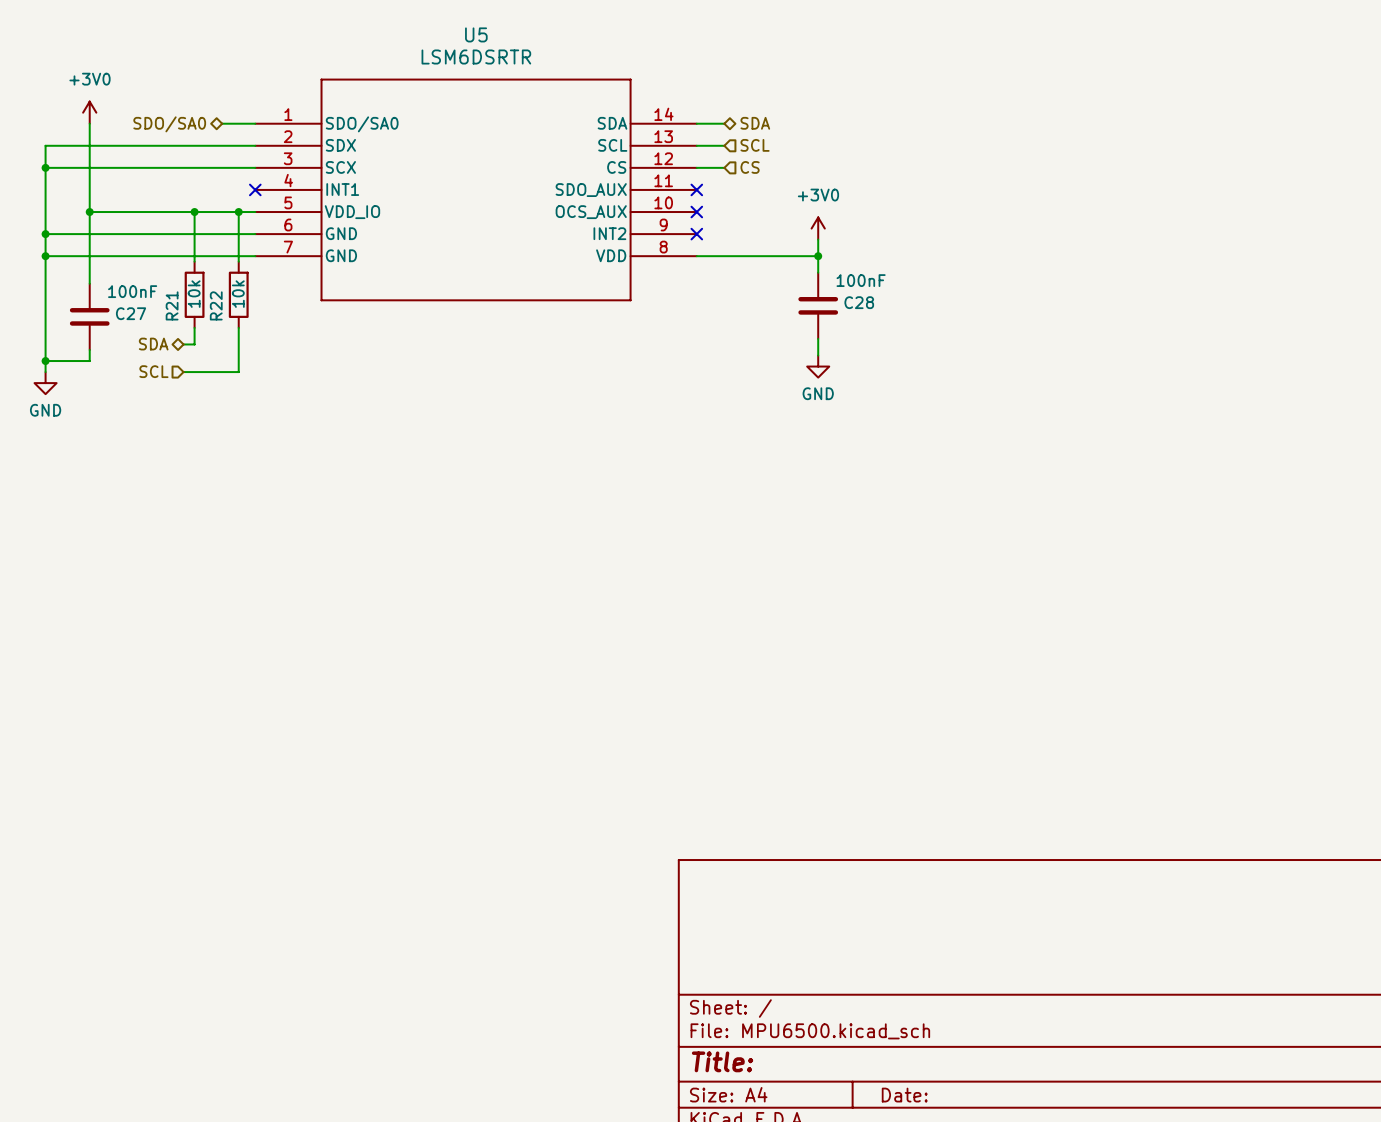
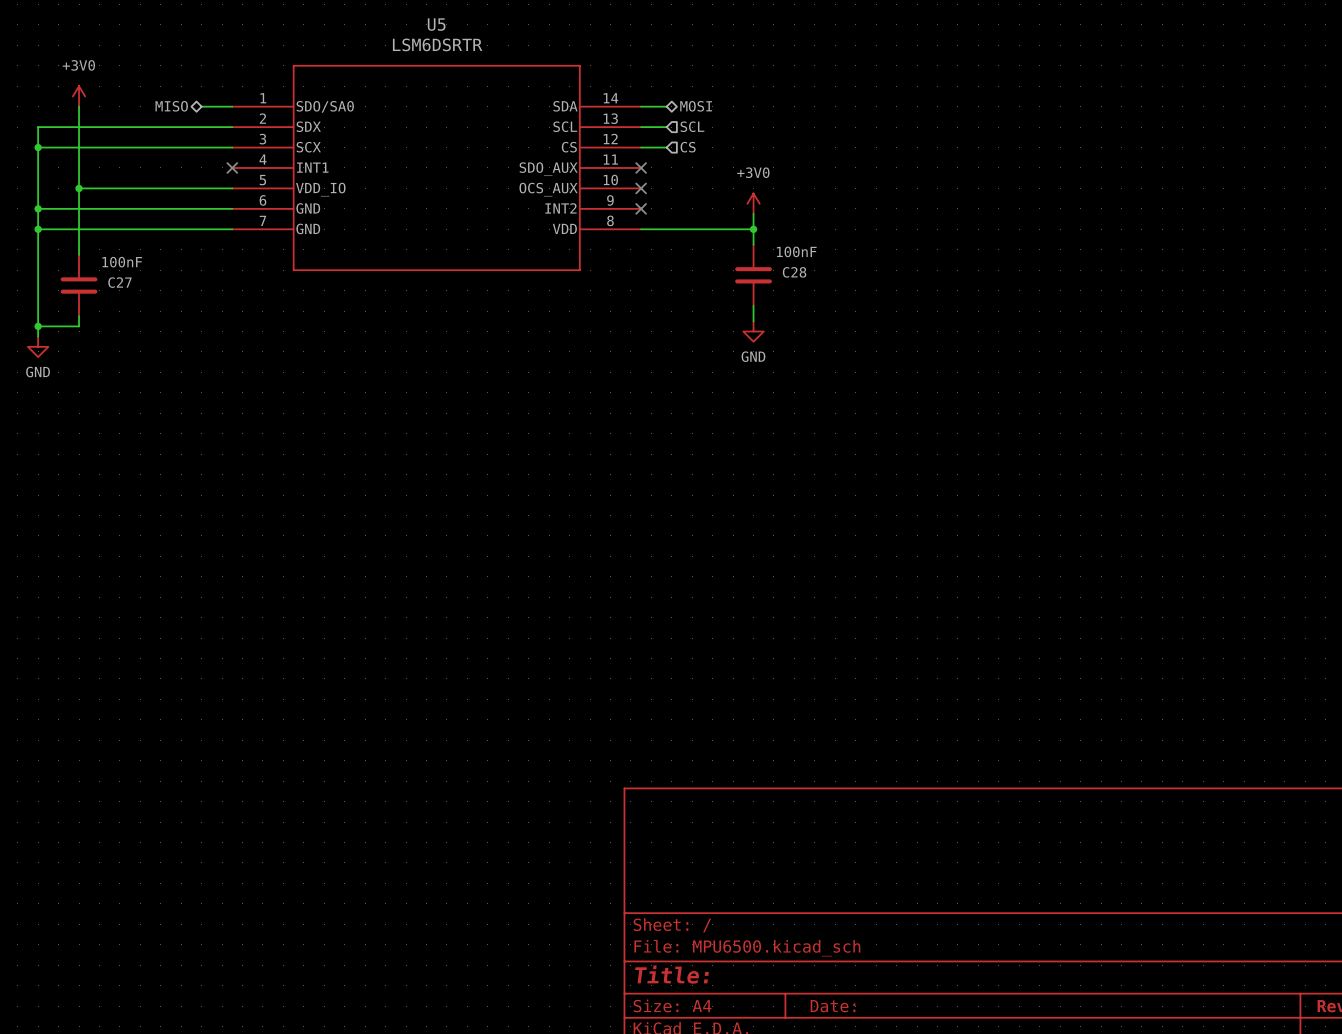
hierarchical label: SDA (755, 123) -> MOSI (696, 106)
hierarchical label: SDO/SA0 (169, 124) -> MISO (171, 106)
wire: (194, 212) (194, 261) -> none
junction: (194, 212) -> none
wire: (238, 212) (238, 261) -> none
junction: (238, 212) -> none
R21: 10k (194, 294) -> none
R22: 10k (238, 294) -> none
wire: (194, 327) (194, 344) (183, 344) -> none
wire: (238, 327) (238, 372) (183, 372) -> none
hierarchical label: SDA (153, 344) -> none
hierarchical label: SCL (153, 371) -> none

